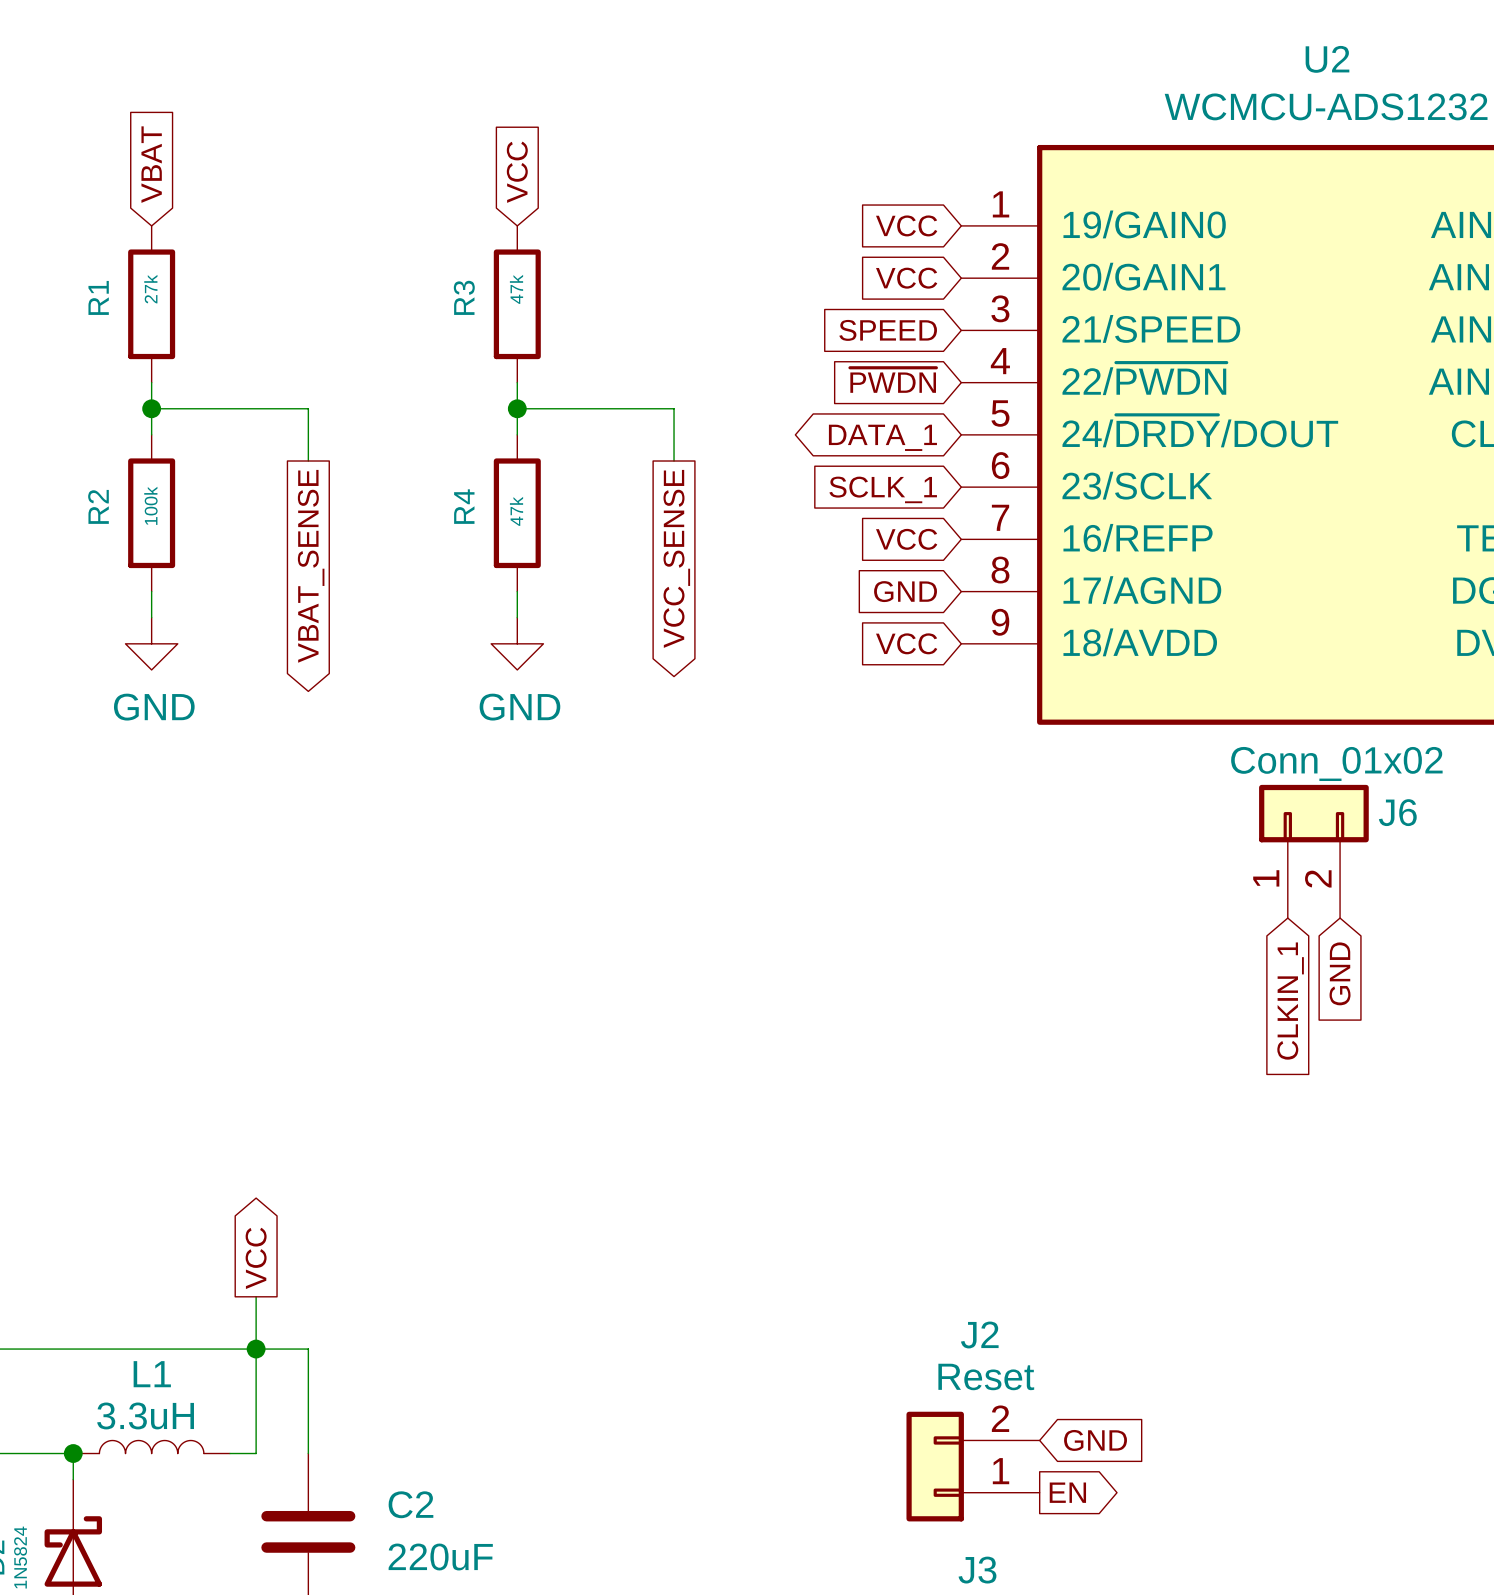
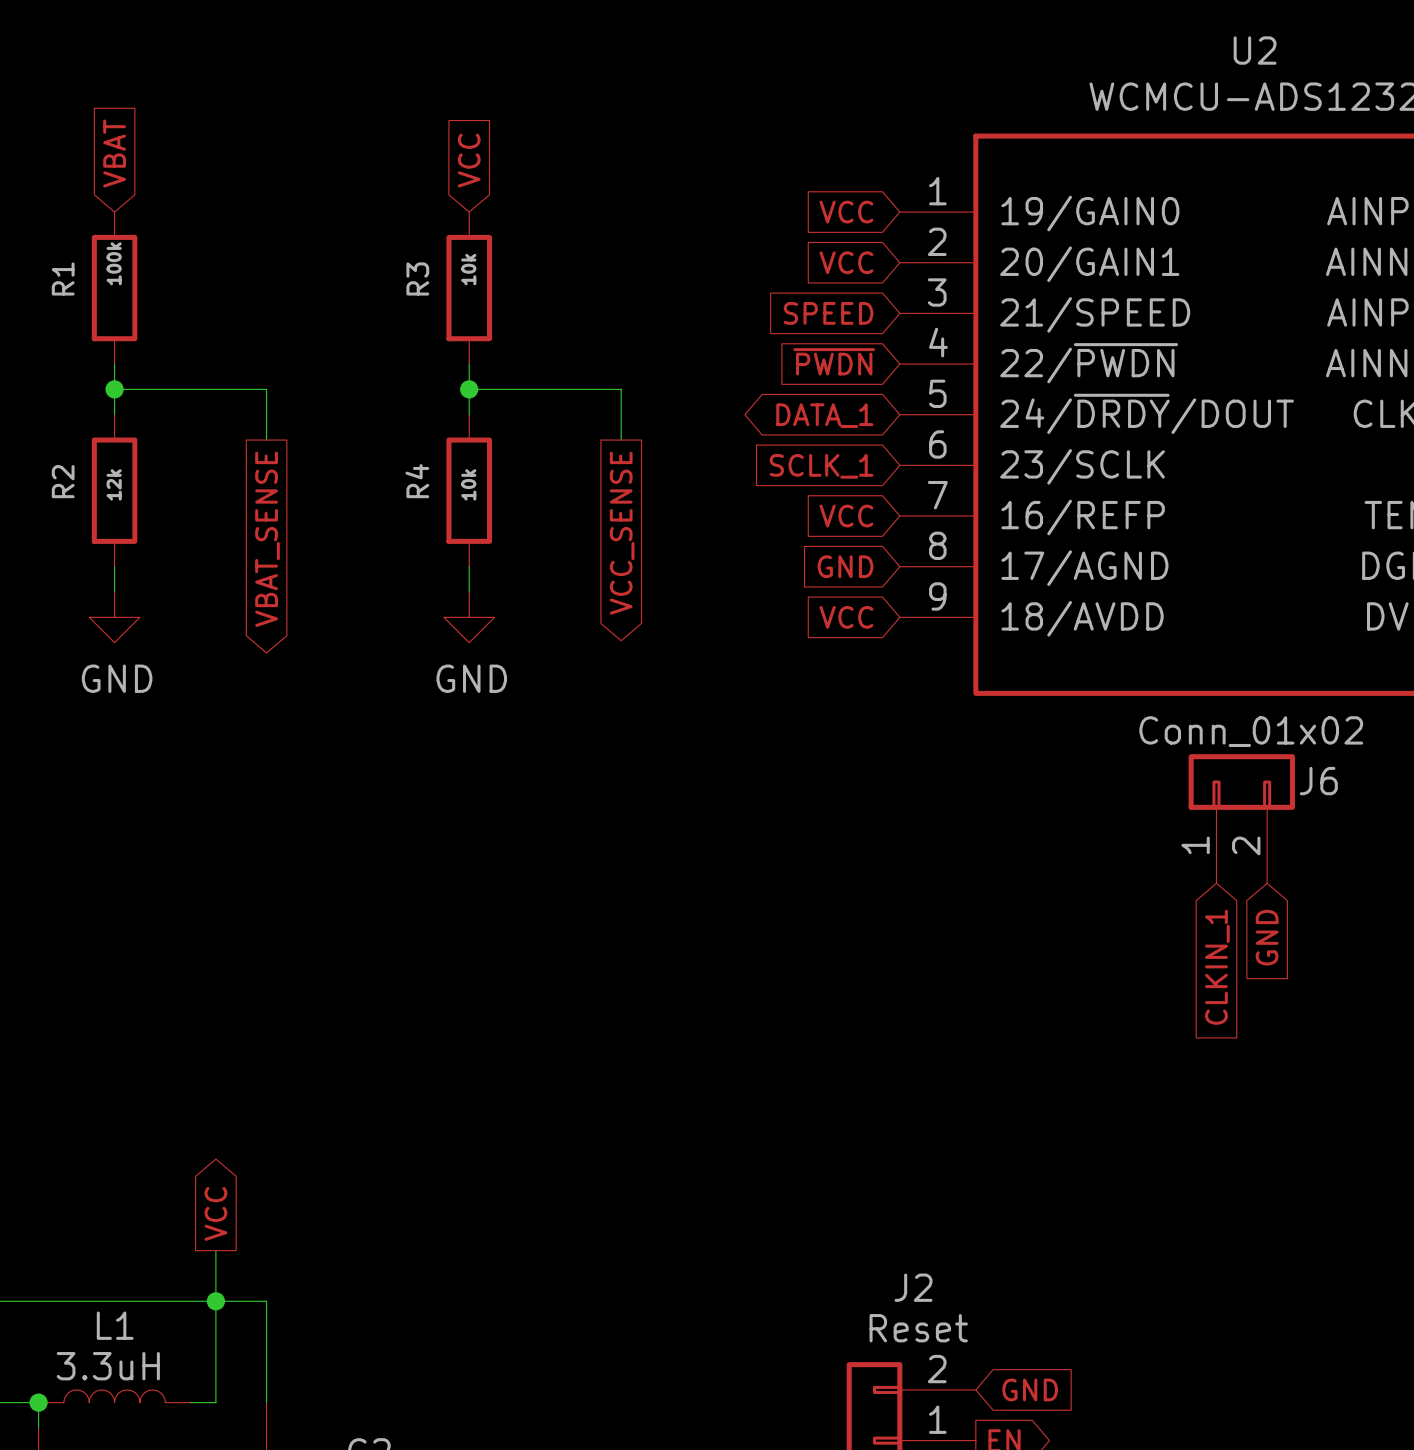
R1 value: 27k (150, 289) -> 100k (114, 263)
R3 value: 47k (516, 289) -> 10k (468, 269)
R2 value: 100k (150, 505) -> 12k (114, 484)
R4 value: 47k (516, 511) -> 10k (468, 484)

